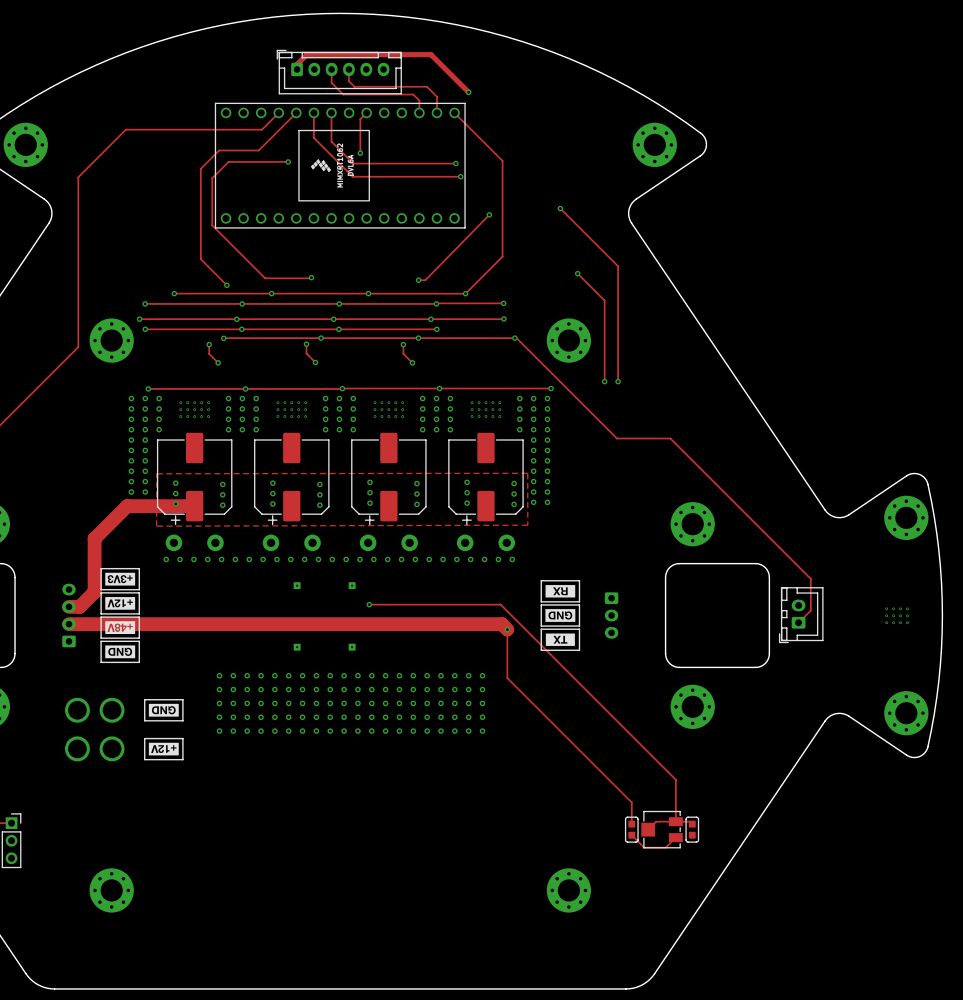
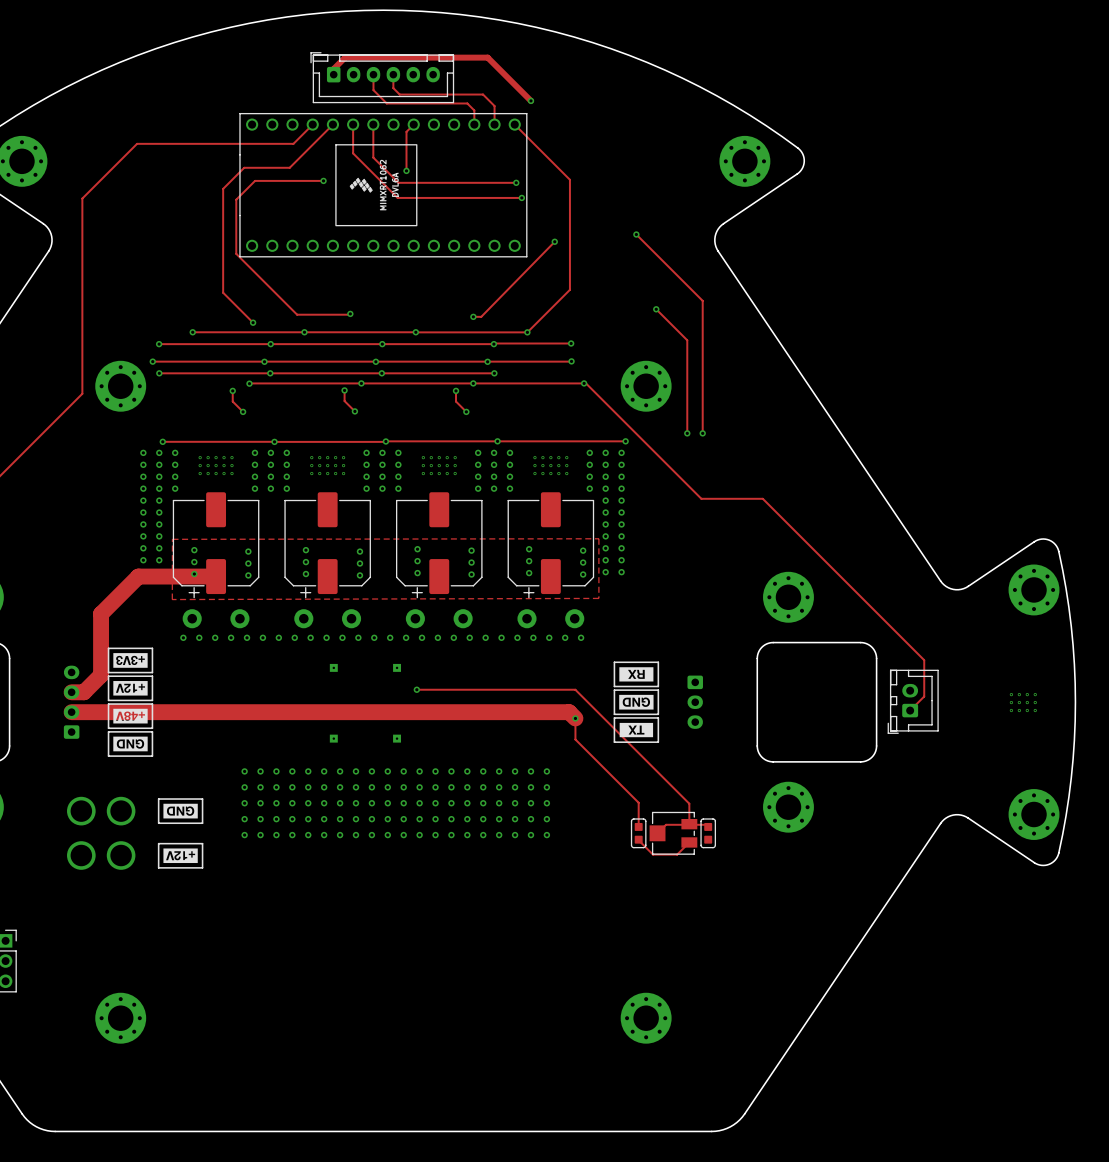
track: (500, 604) (675, 779) (675, 821) -> (567, 689) (575, 689) (689, 803) (689, 824)
track: (507, 647) (507, 678) (631, 802) (631, 824) -> (575, 739) (638, 802) (638, 827)
track: none -> (705, 824) (666, 824) (657, 833)
part: none -> (638, 833)
part: none -> (708, 833)
track: none -> (638, 840) (652, 854) (677, 854) (689, 842)
track: (689, 821) (656, 821) (648, 829) -> none
part: (631, 829) -> none
part position: (662, 829) -> (673, 833)
part: (692, 829) -> none
track: (631, 835) (644, 847) (665, 847) (675, 837) -> none

